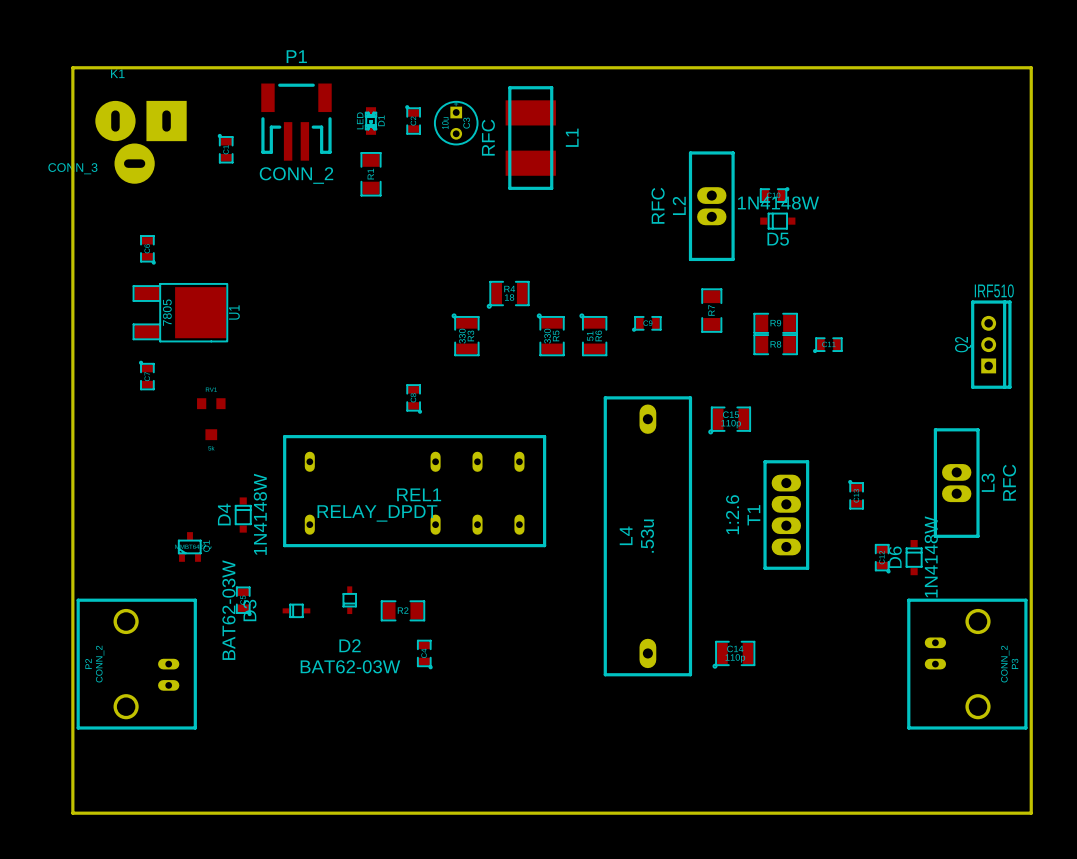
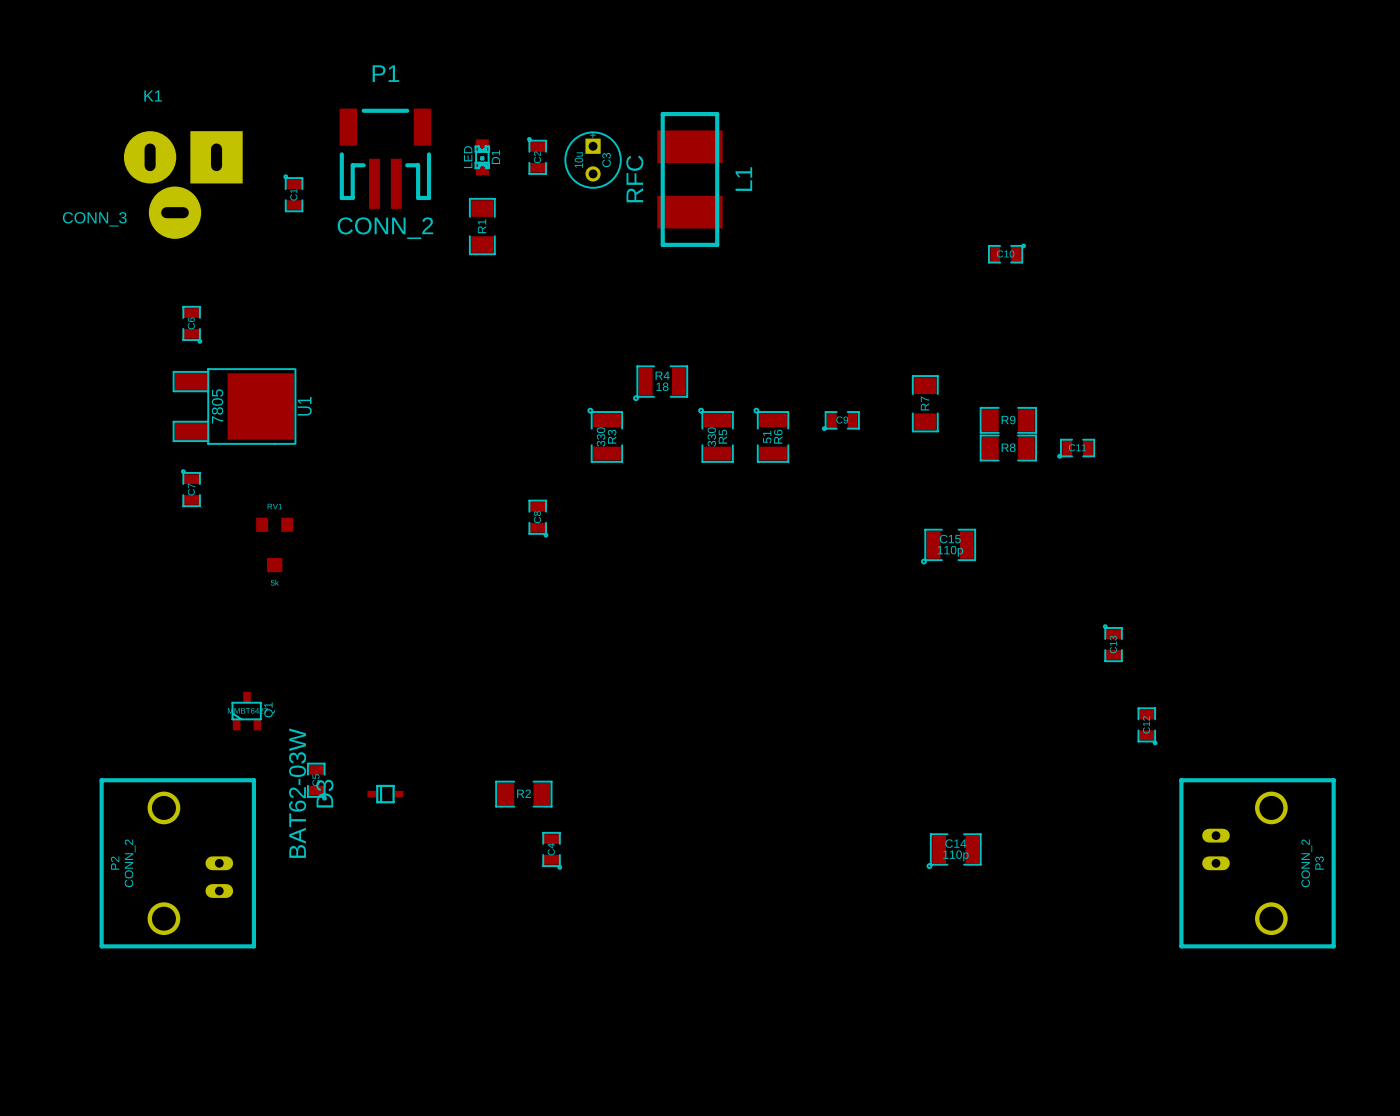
board edge: (72, 67) (72, 813) (1031, 813) (1031, 67) (72, 67) -> none
L2: RFC (711, 206) -> none
D5: 1N4148W (777, 221) -> none
Q2: IRF510 (991, 344) -> none
L3: RFC (956, 483) -> none
REL1: RELAY_DPDT (414, 491) -> none
D4: 1N4148W (243, 515) -> none
T1: 1:2.6 (786, 515) -> none
L4: .53u (647, 536) -> none
D6: 1N4148W (914, 557) -> none
D2: BAT62-03W (349, 600) -> none

